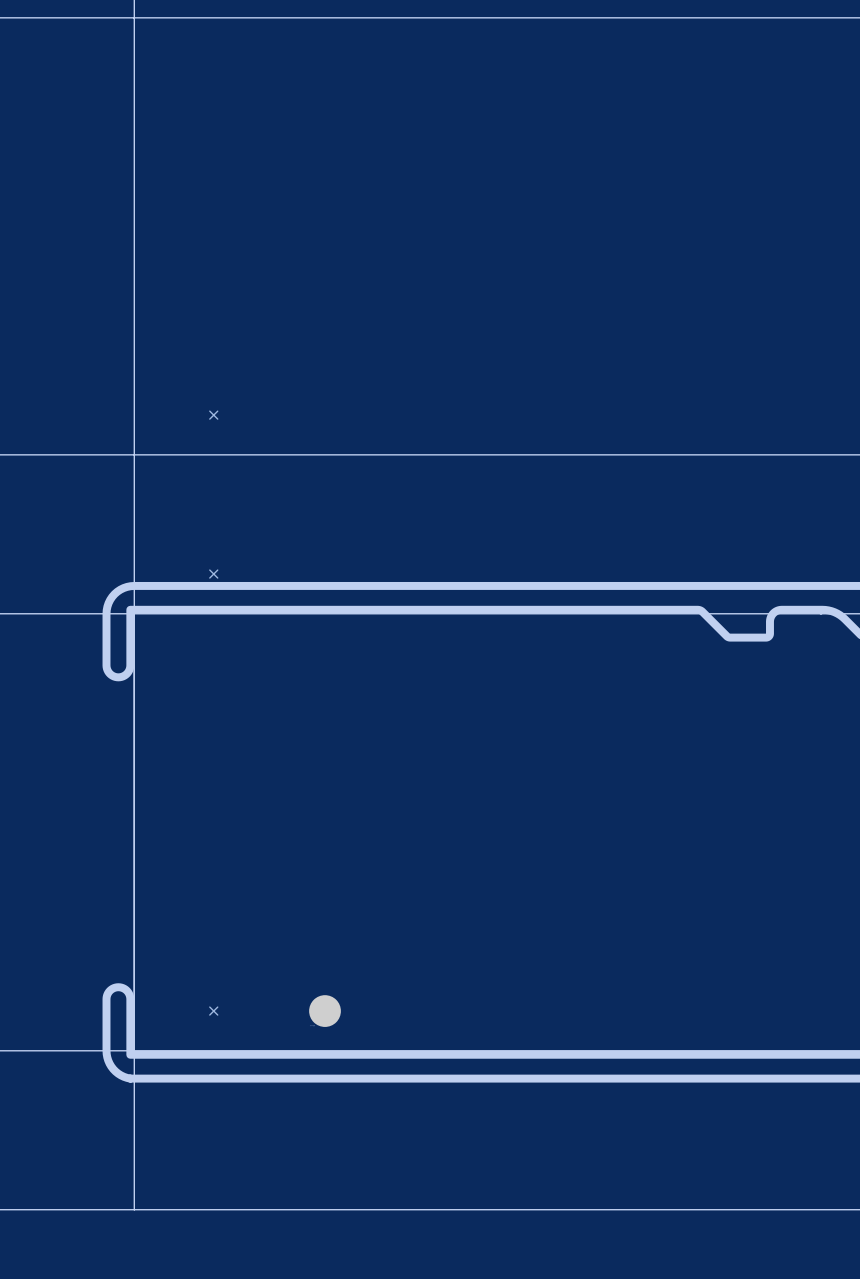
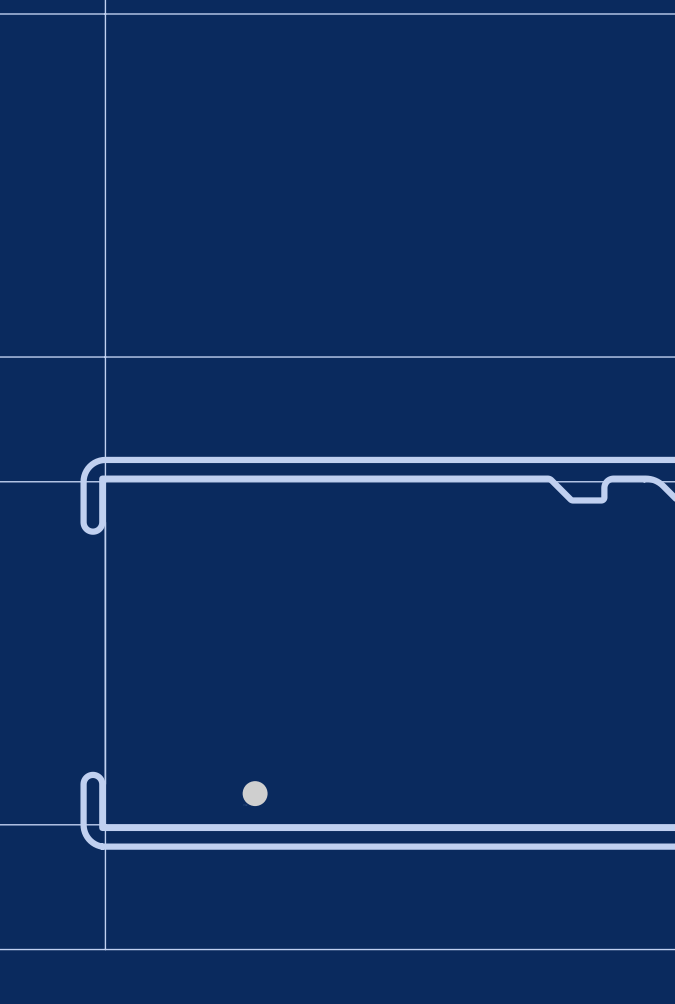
line: (209, 411) (217, 419) -> none
line: (217, 411) (209, 419) -> none
line: (209, 570) (217, 578) -> none
line: (217, 570) (209, 578) -> none
line: (209, 1007) (217, 1015) -> none
line: (217, 1007) (209, 1015) -> none

